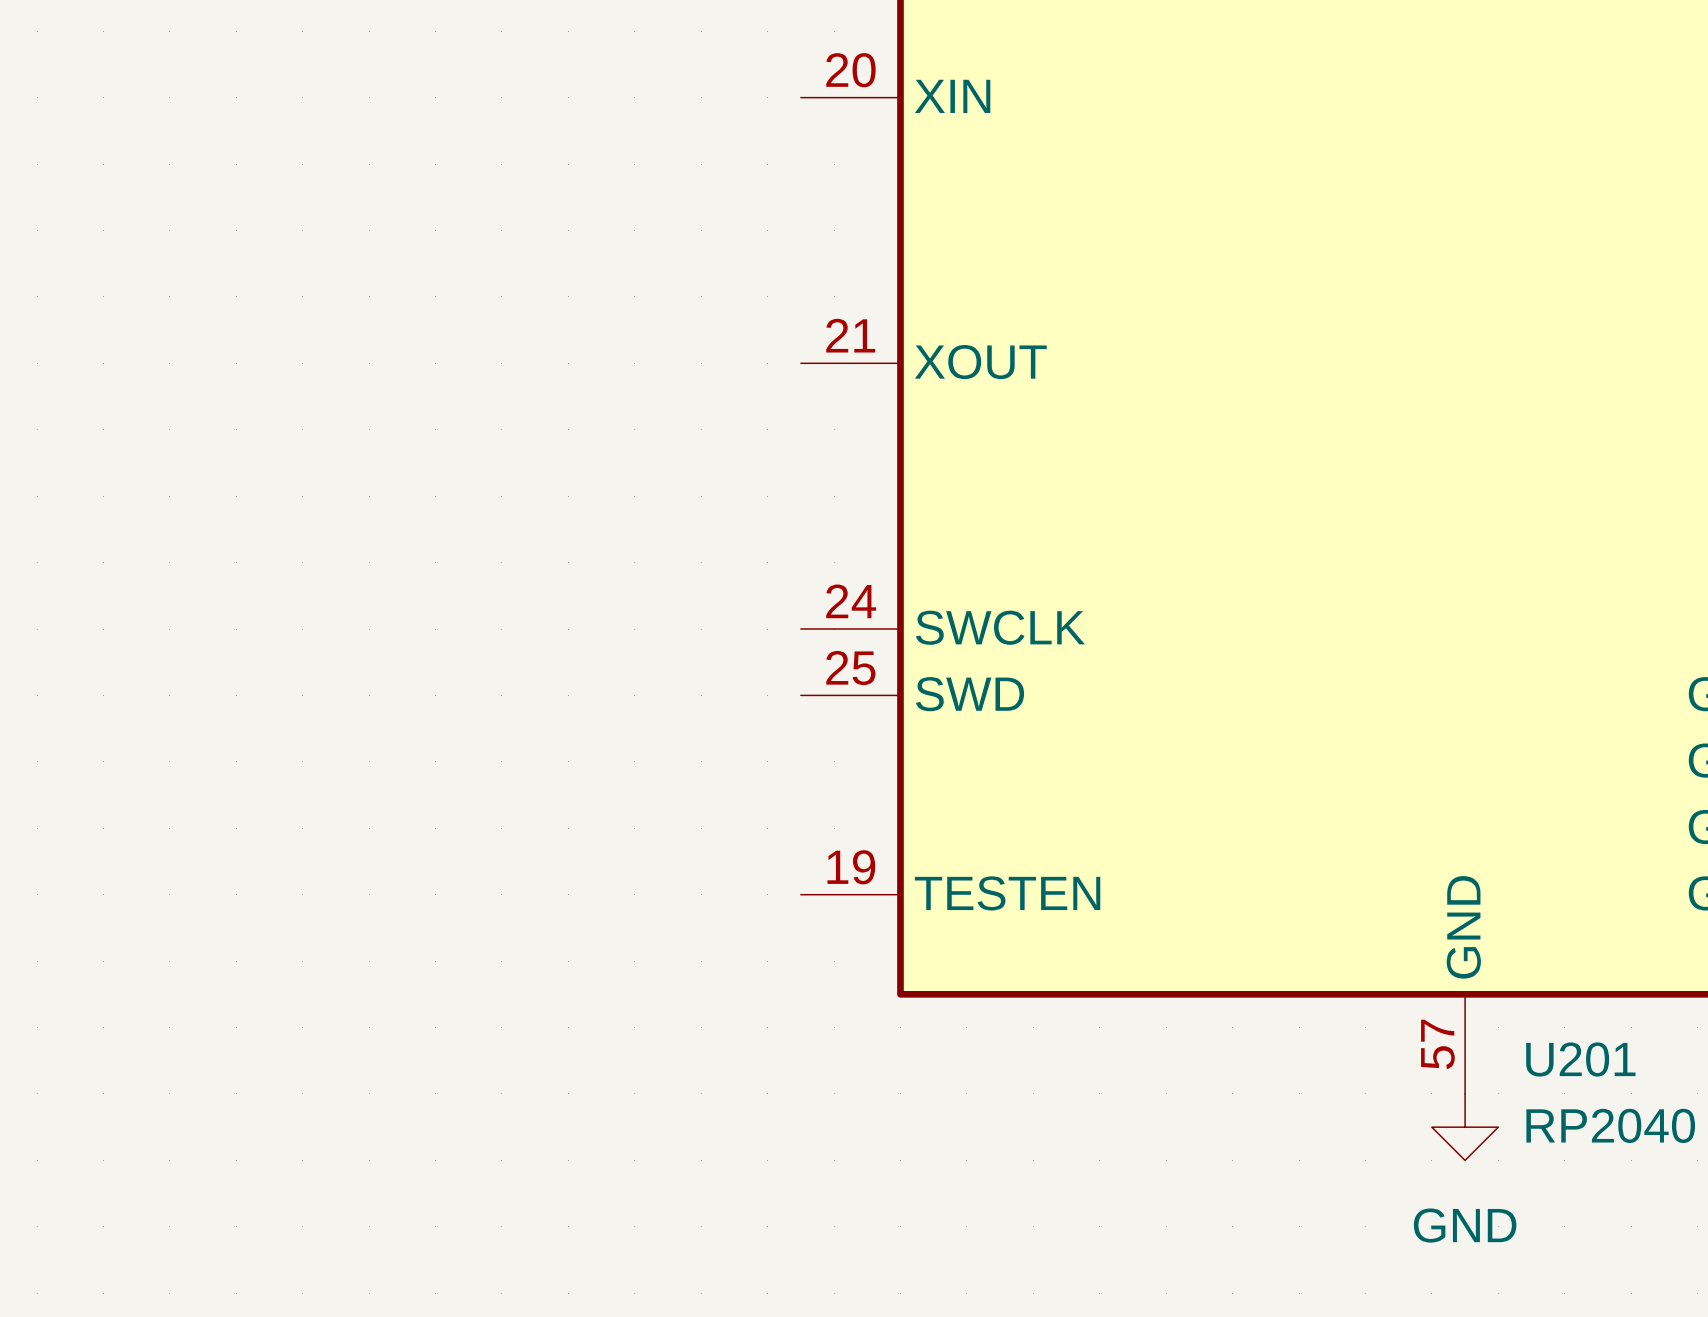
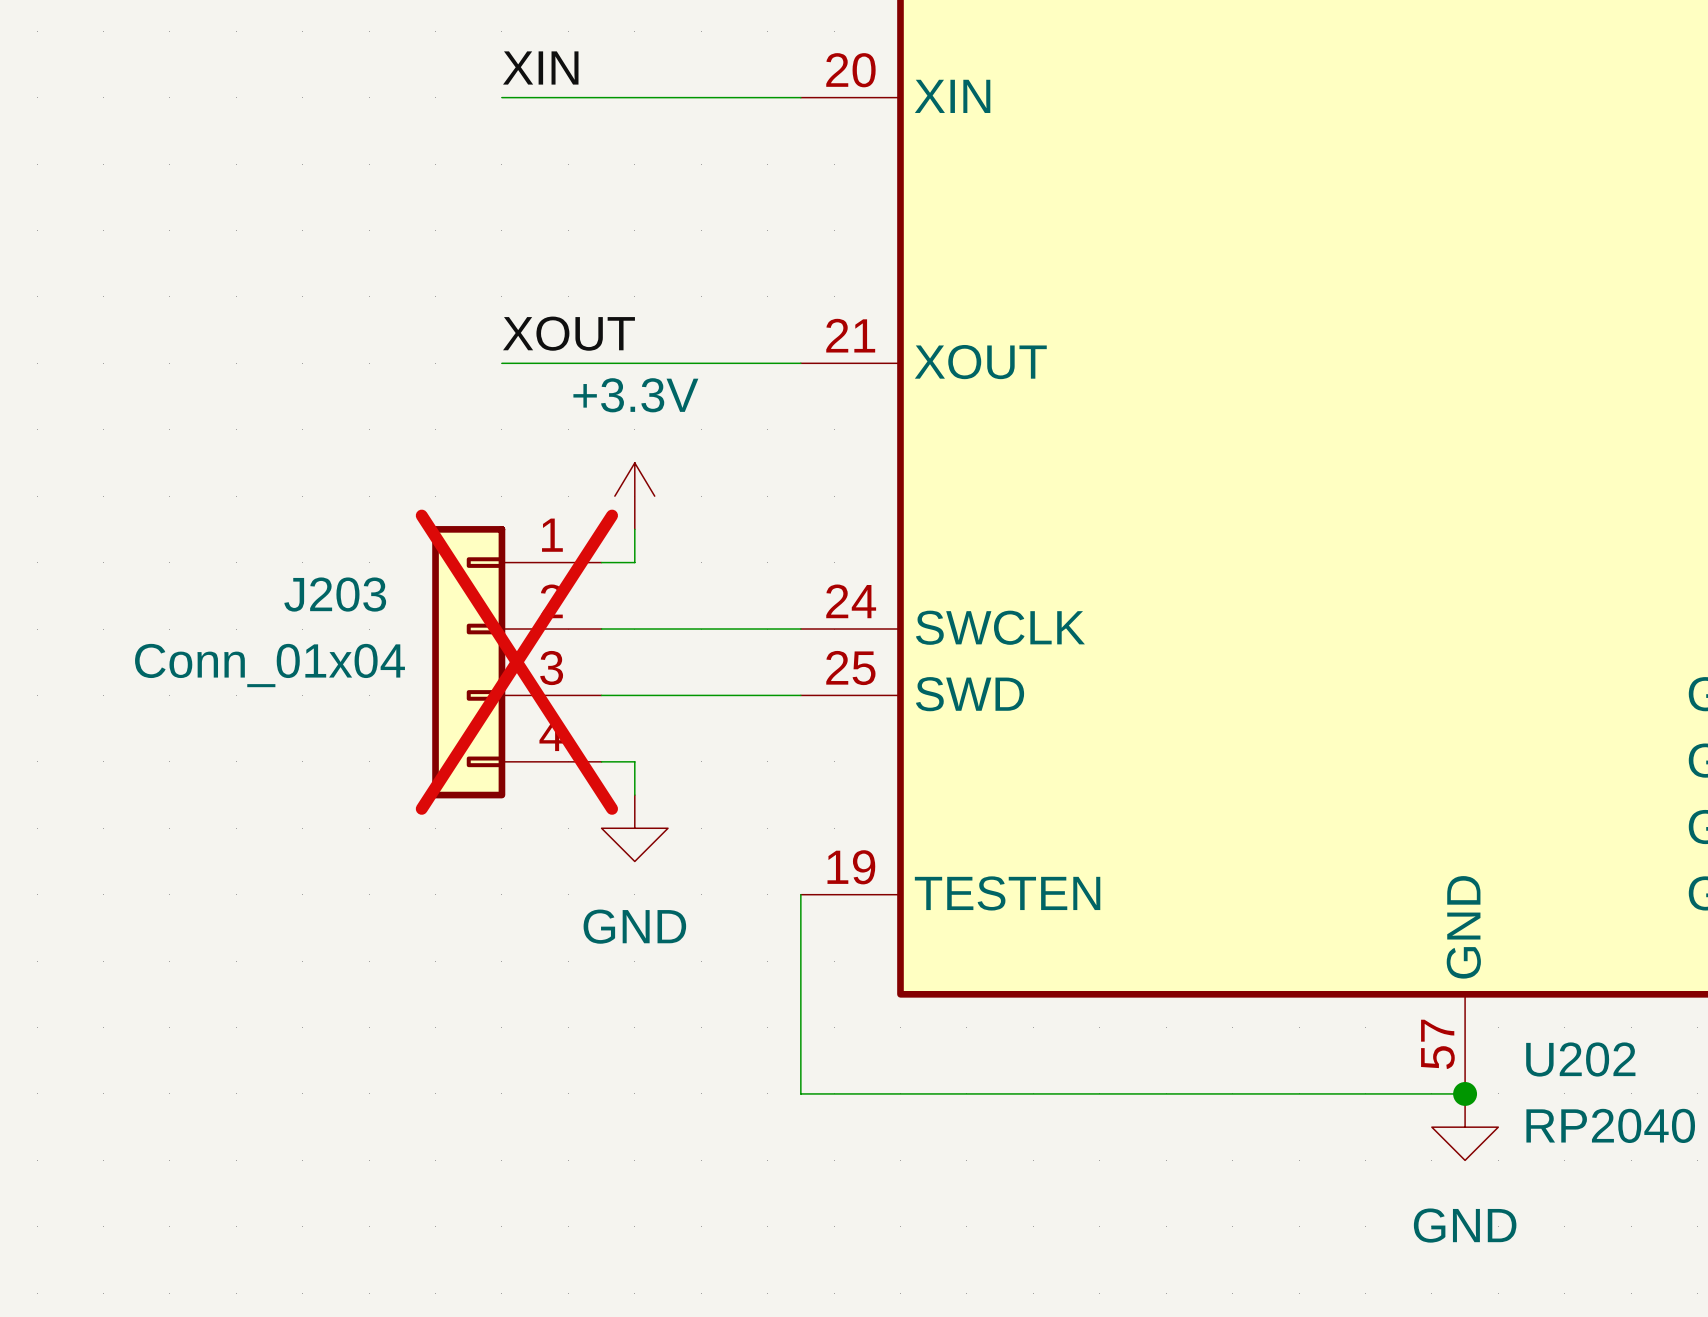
label: none -> XIN (540, 67)
wire: none -> (501, 97) (800, 97)
label: none -> XOUT (568, 333)
wire: none -> (501, 363) (800, 363)
power symbol: none -> +3.3V (634, 496)
wire: none -> (634, 529) (634, 562) (601, 562)
wire: none -> (601, 629) (800, 629)
J203: none -> Conn_01x04 (516, 662)
wire: none -> (601, 695) (800, 695)
wire: none -> (601, 761) (634, 761) (634, 795)
power symbol: none -> GND (634, 828)
wire: none -> (800, 894) (800, 1093) (1465, 1093)
U201 name: U201 (1580, 1059) -> U202 (1580, 1059)
junction: none -> (1465, 1093)

